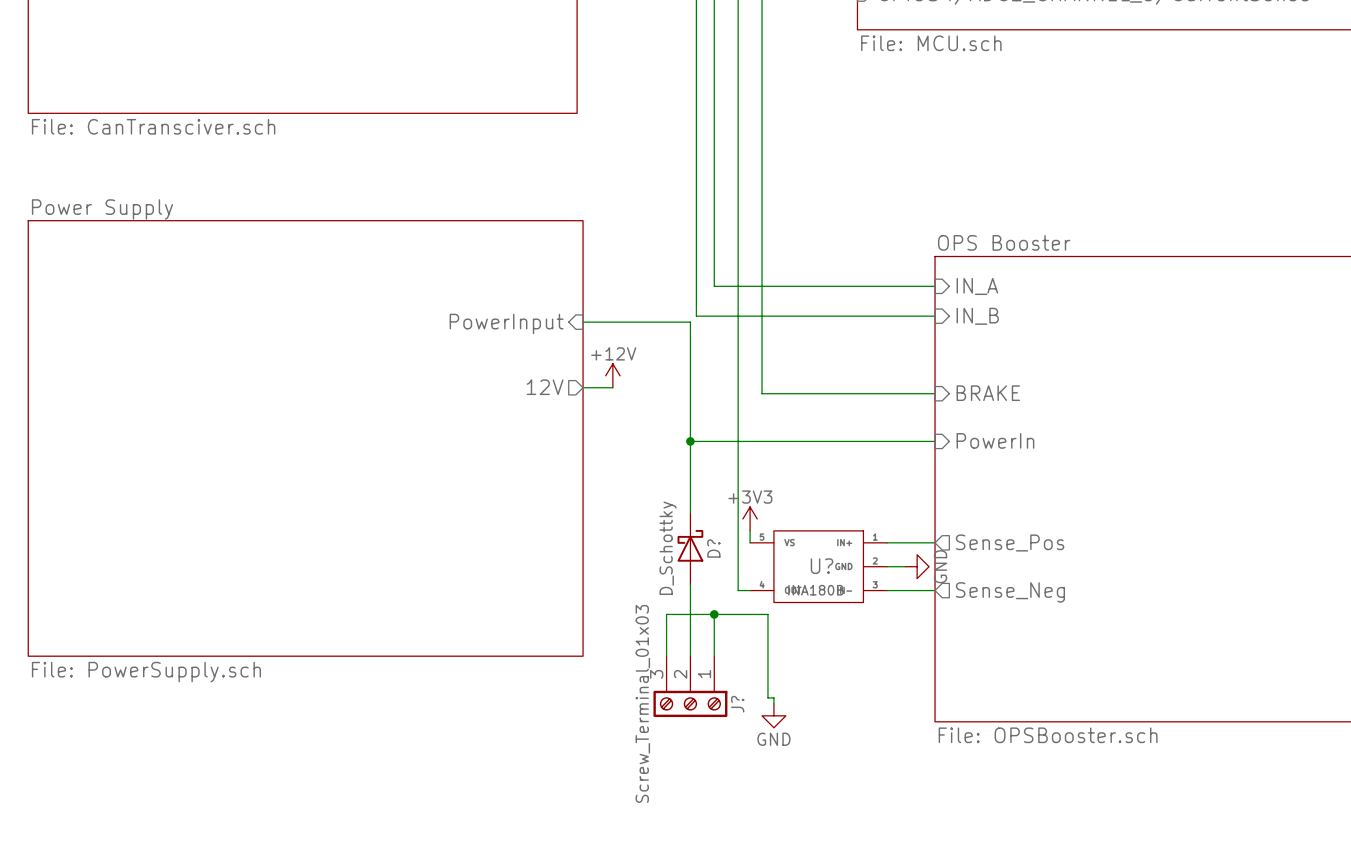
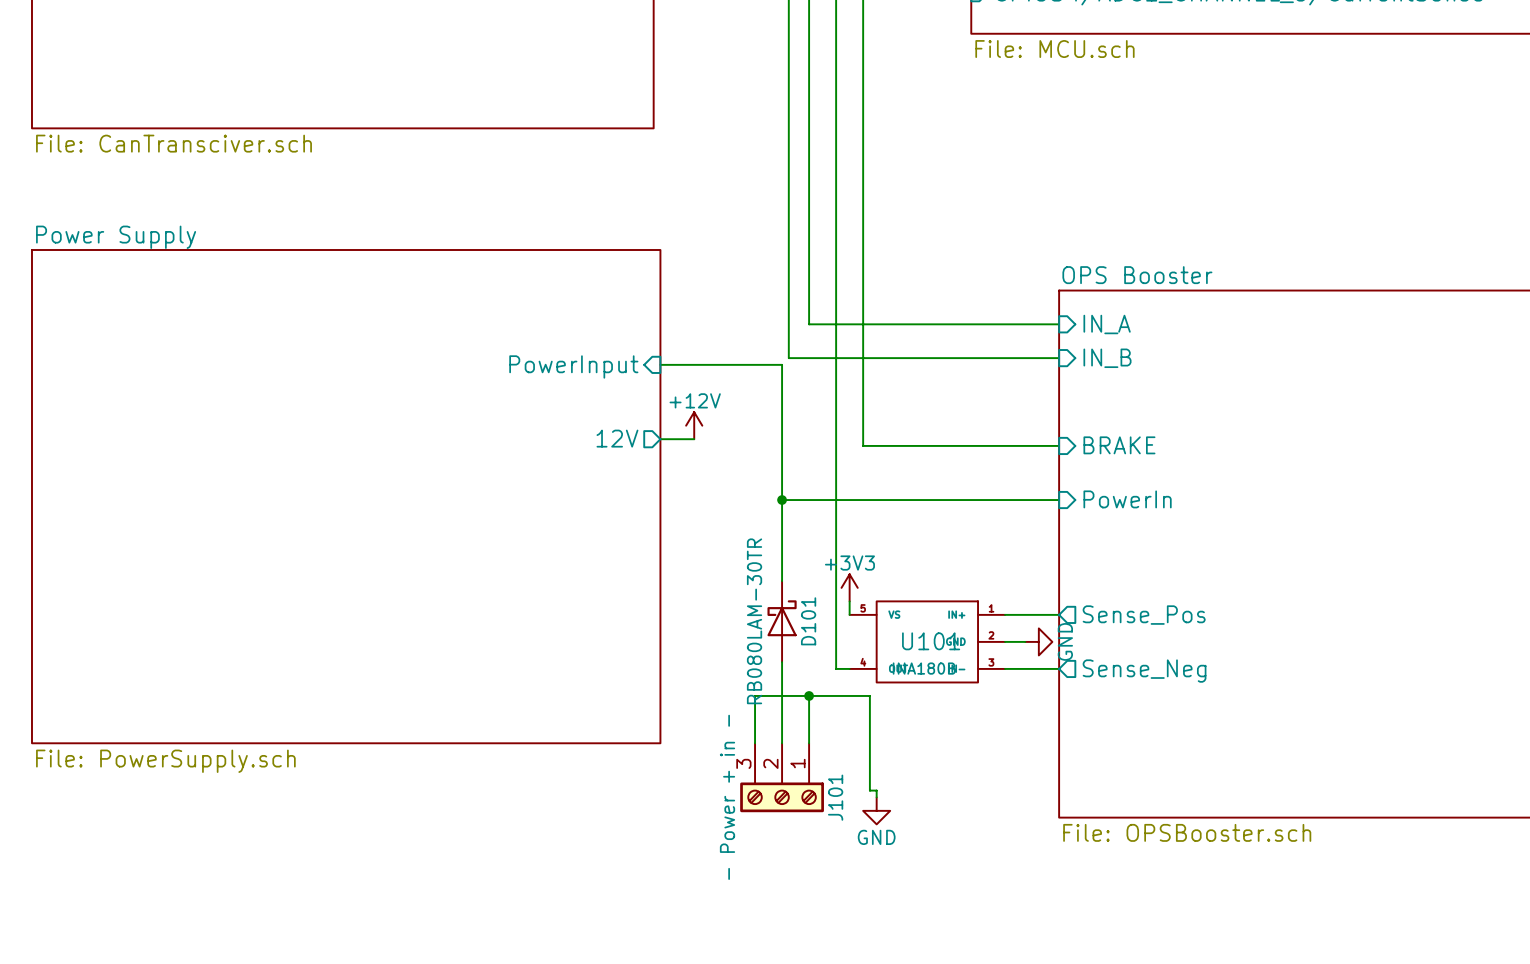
D? value: D_Schottky (668, 548) -> RB080LAM-30TR (754, 621)
D? name: D? (713, 548) -> D101 (808, 621)
U? name: U? (822, 566) -> U101 (931, 641)
J? value: Screw_Terminal_01x03 (642, 703) -> - Power + in - (727, 797)
J? name: J? (737, 704) -> J101 (835, 797)

